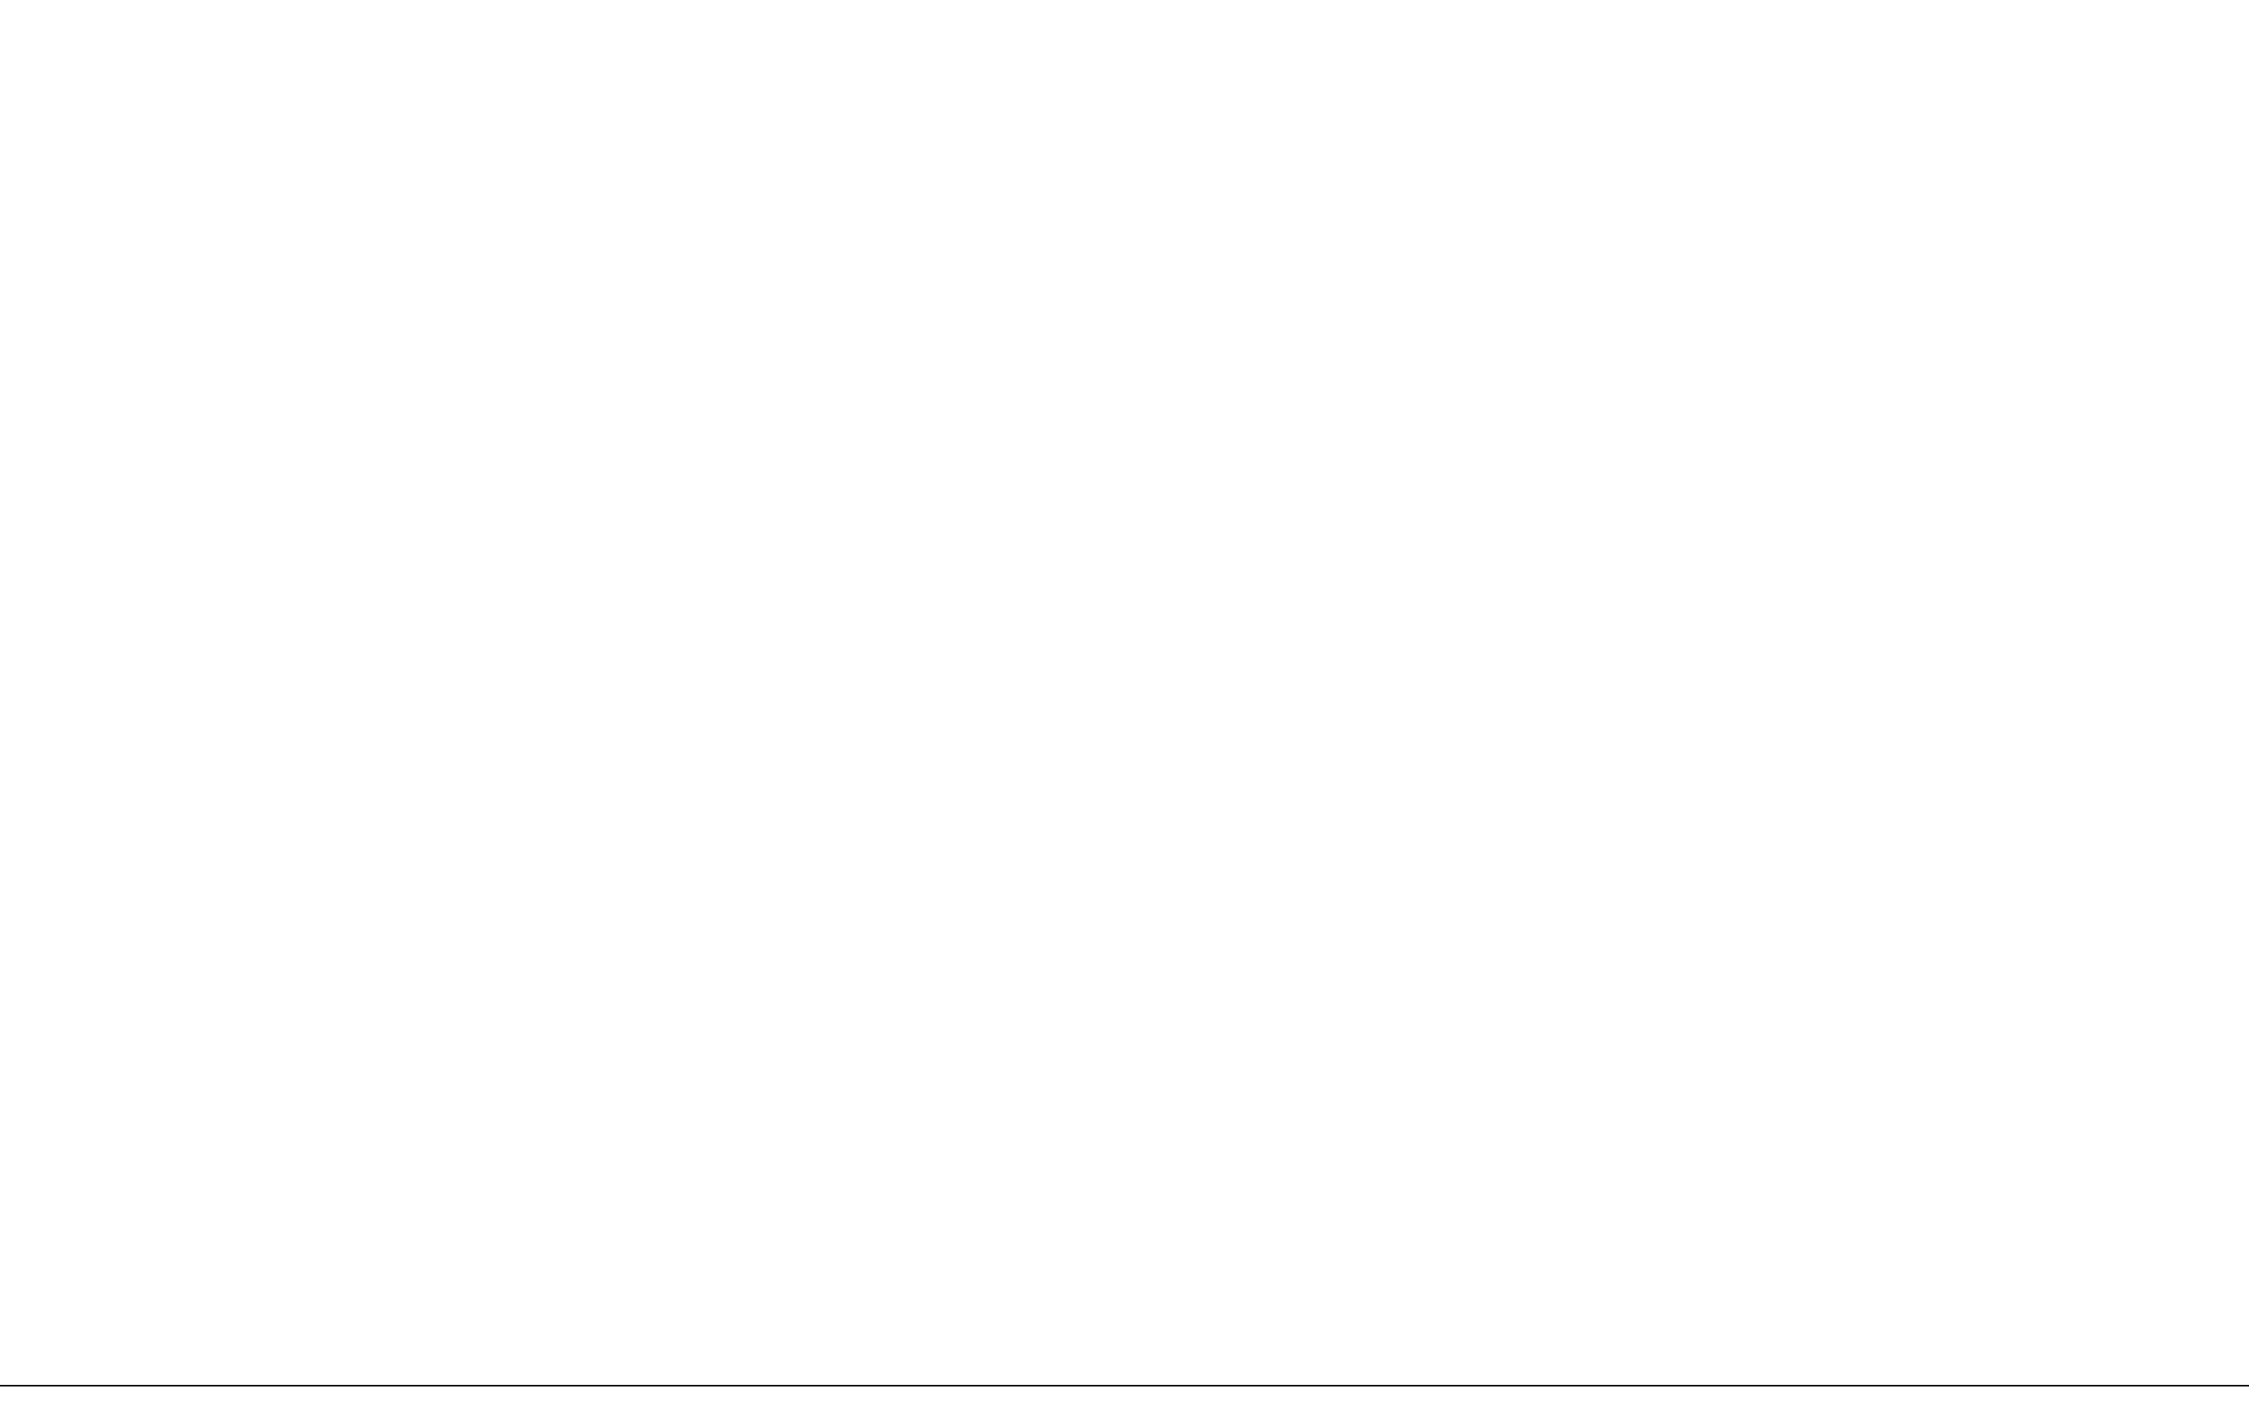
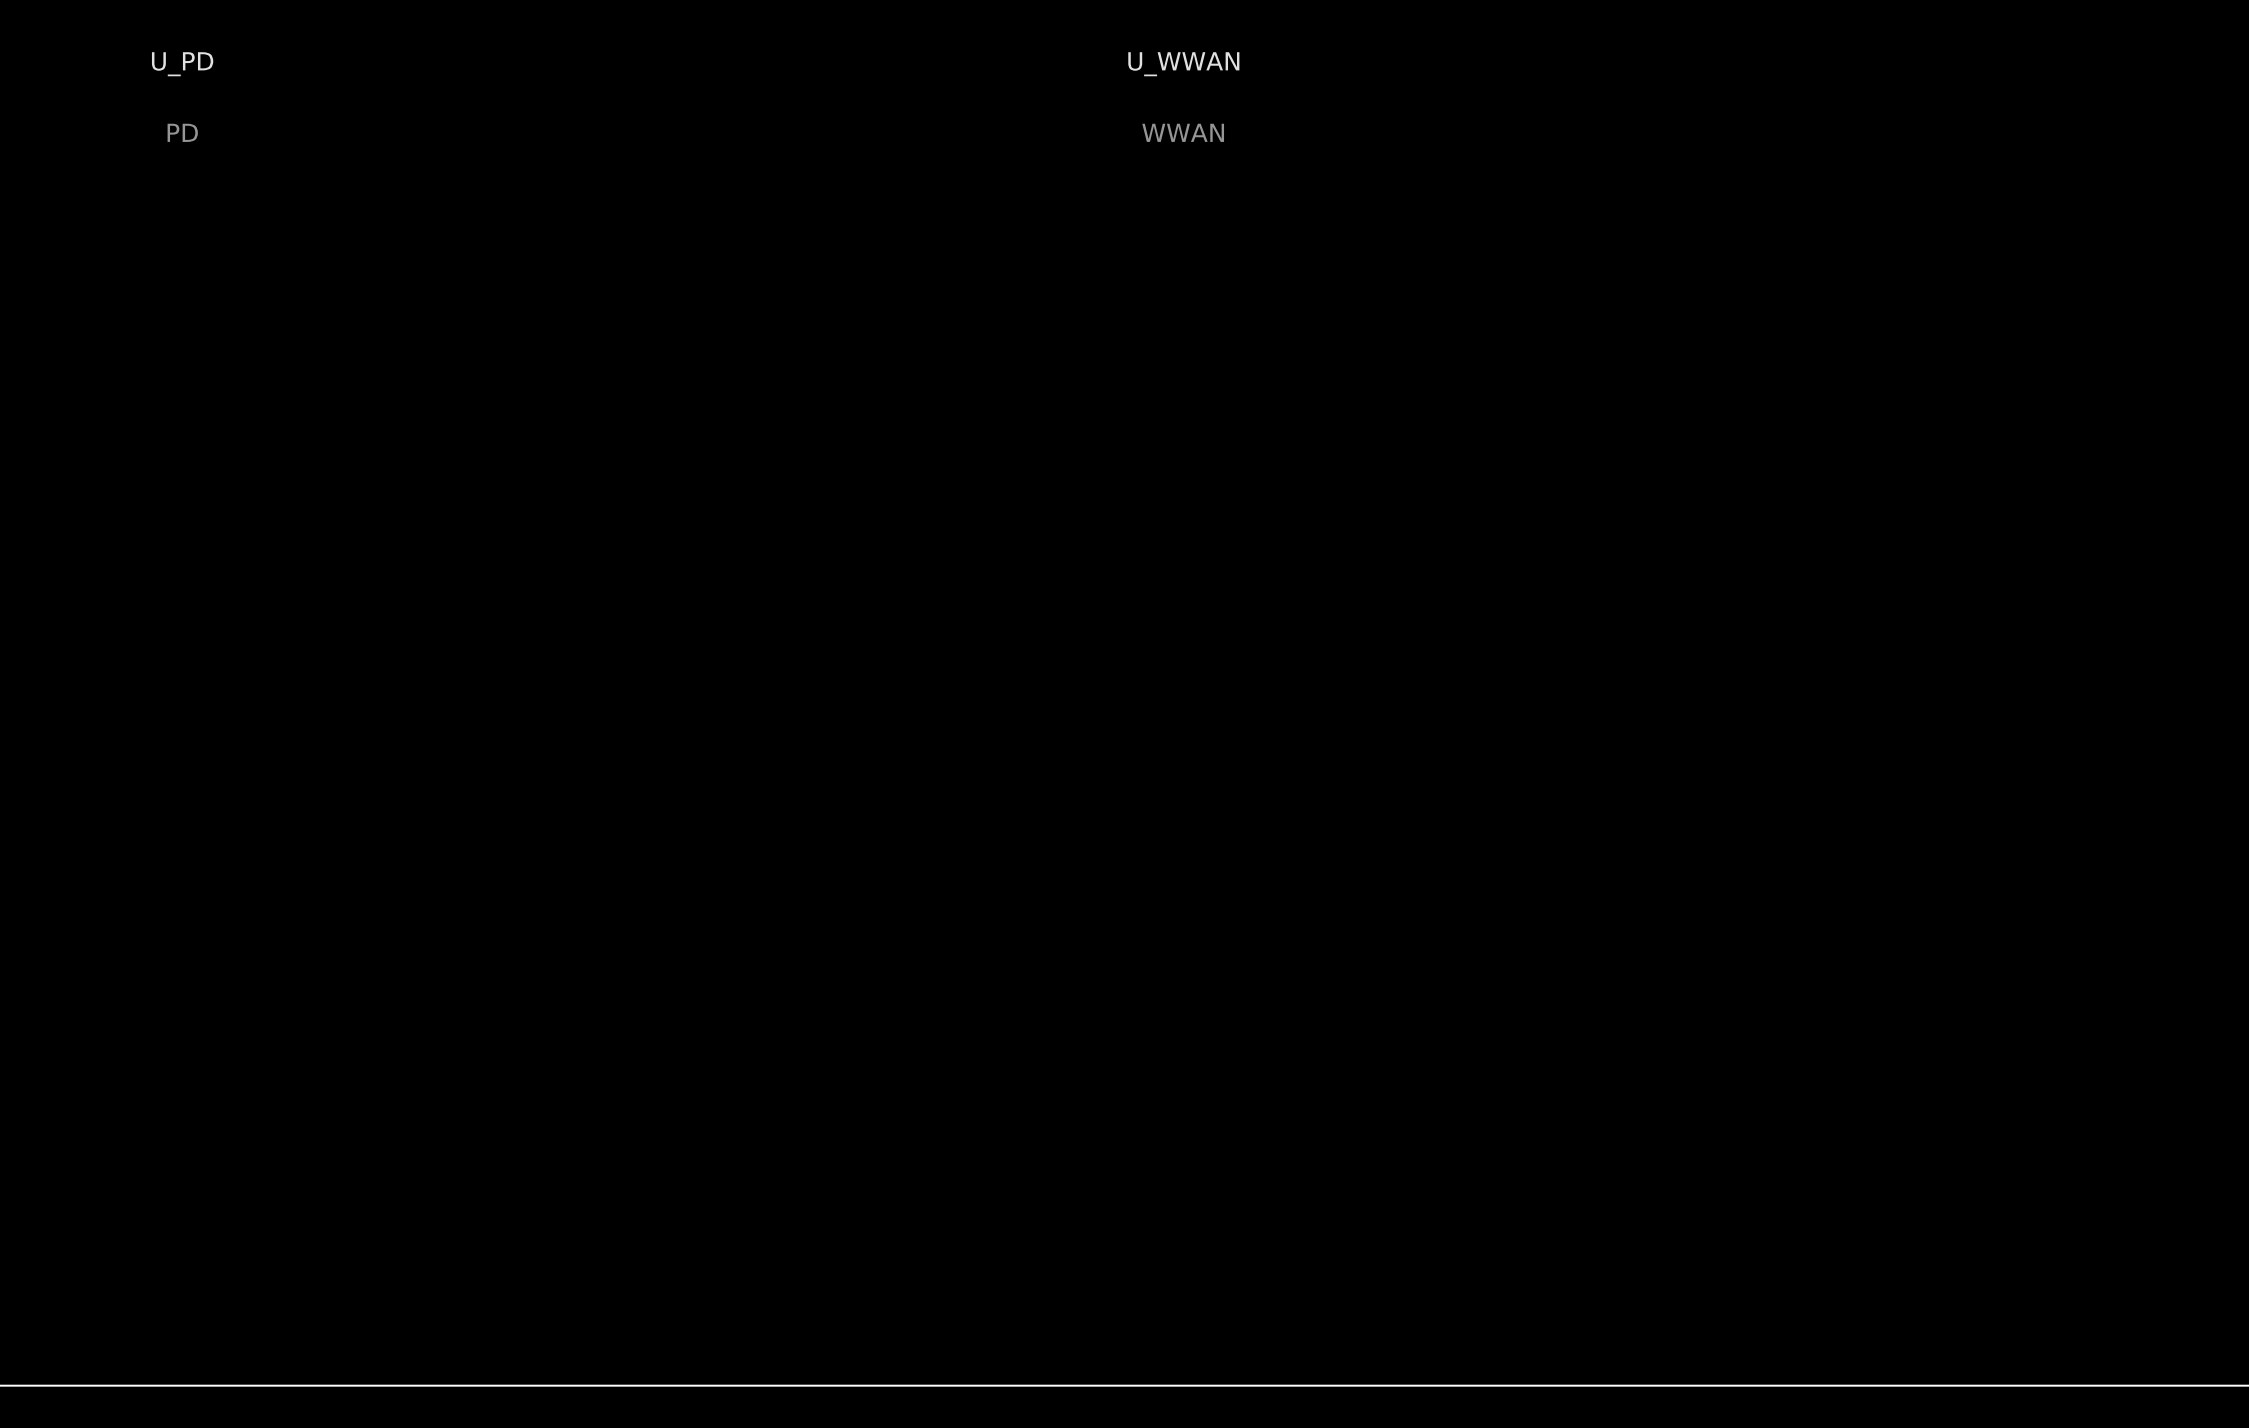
U_PD: none -> PD (182, 97)
U_WWAN: none -> WWAN (1183, 97)

